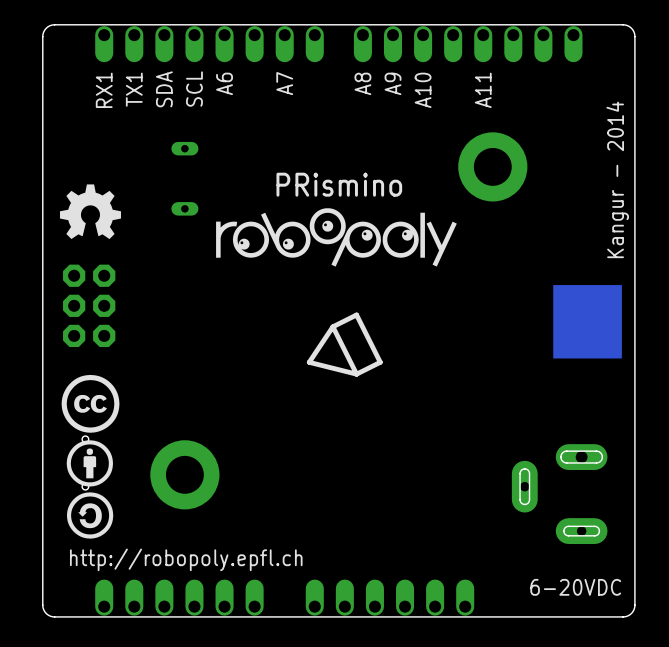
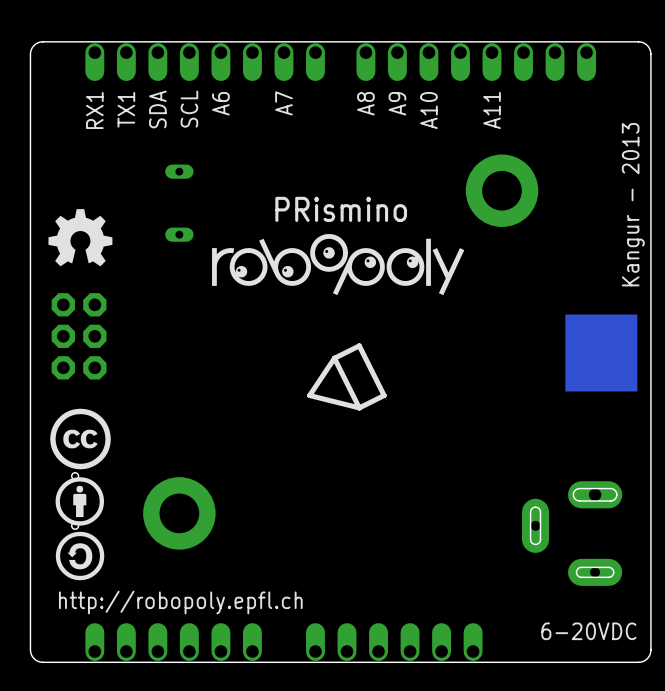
text: Kangur - 2014 (617, 179) -> Kangur - 2013 (633, 204)

